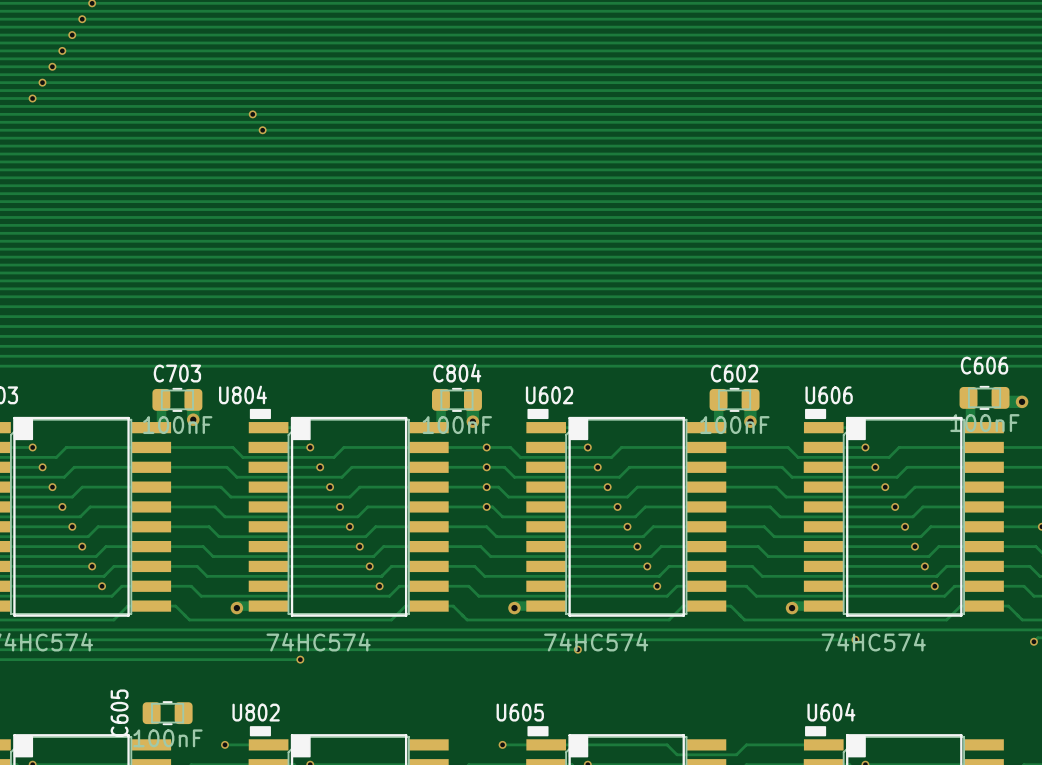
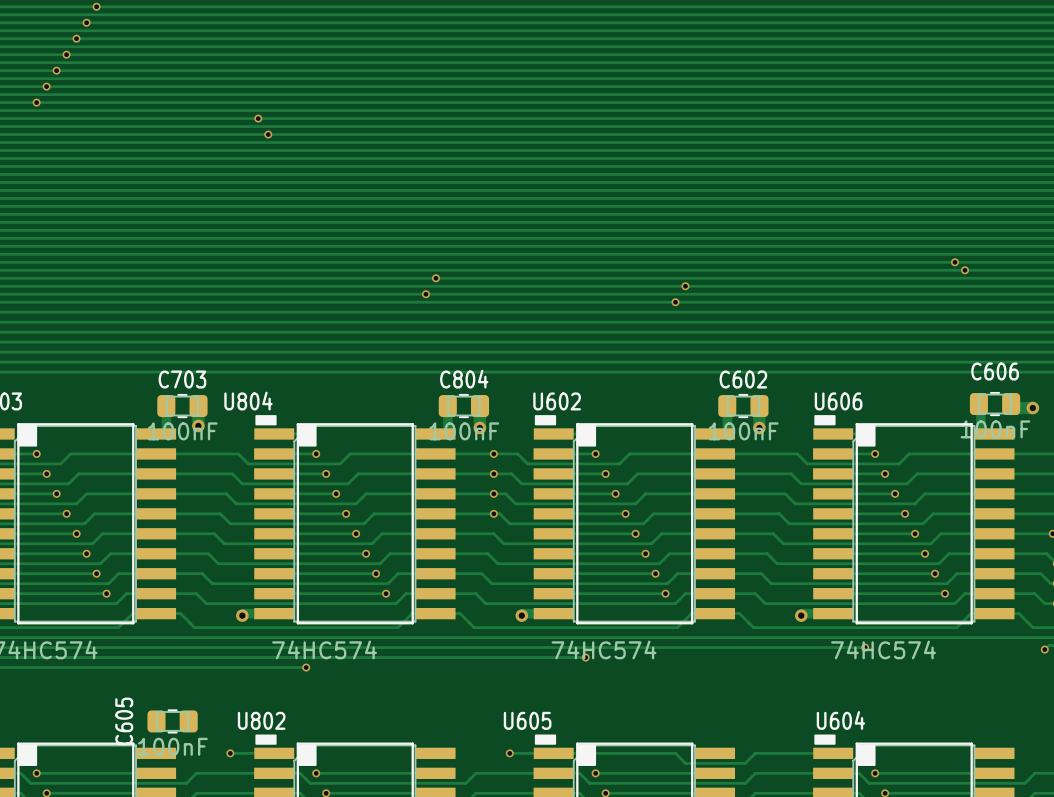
via: none -> (954, 262)
via: none -> (964, 270)
via: none -> (435, 278)
via: none -> (685, 286)
via: none -> (425, 294)
via: none -> (675, 302)

